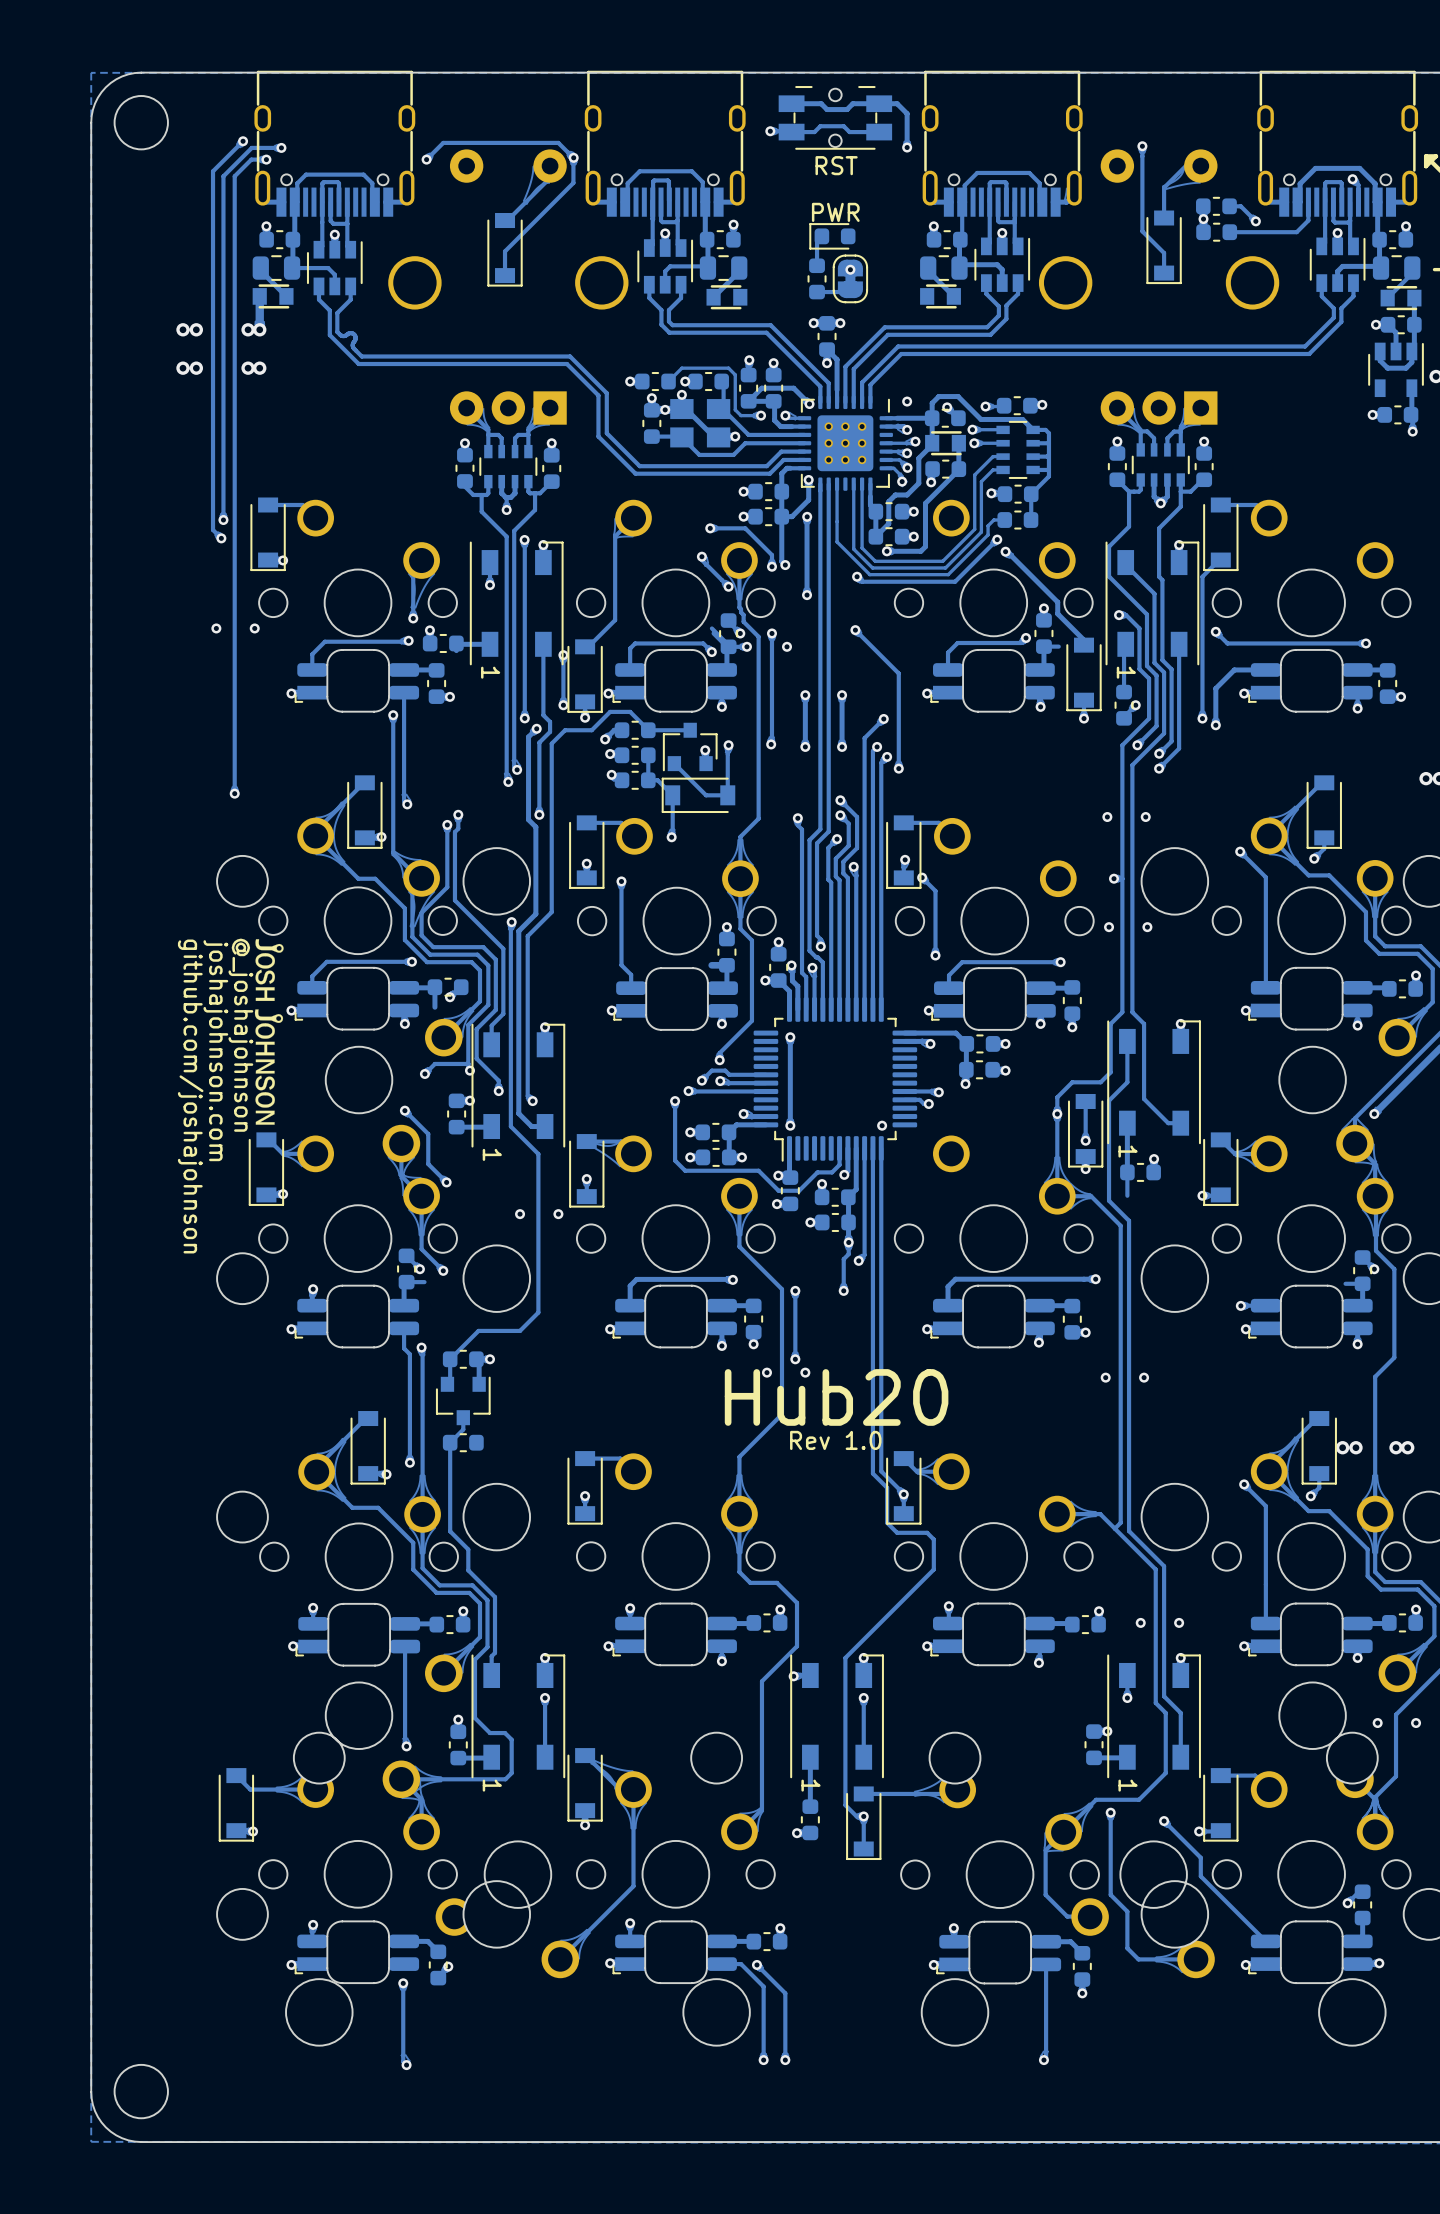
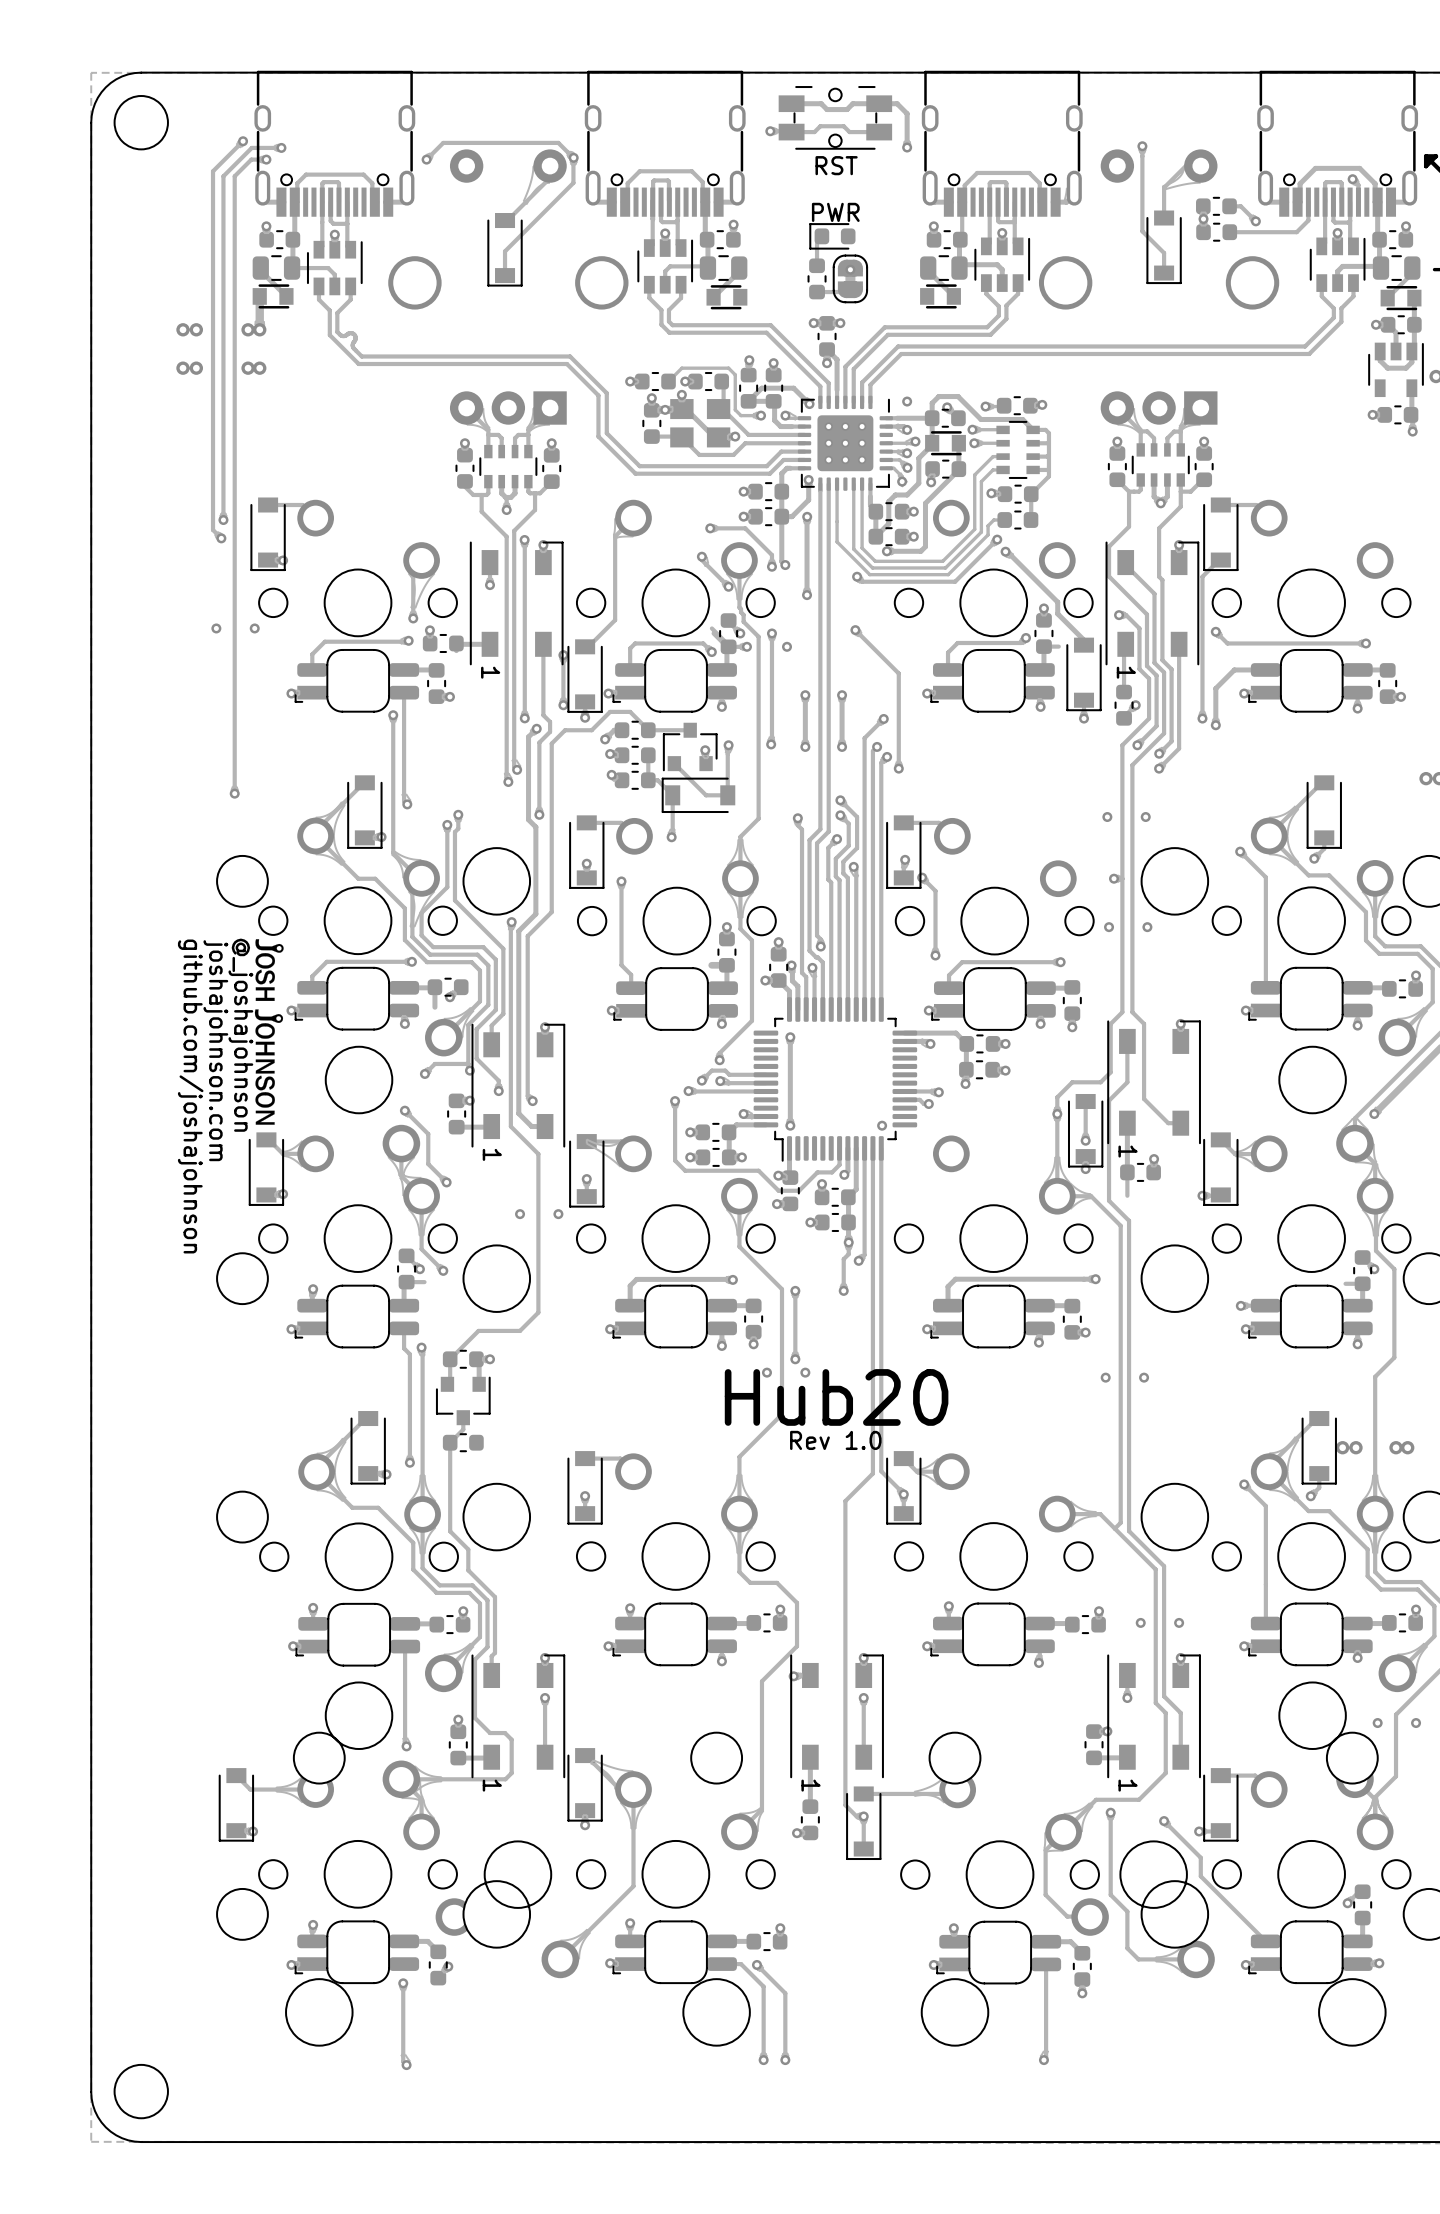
track: (872, 1473) (887, 1487) (887, 1522) (897, 1532) (927, 1532) (933, 1539) (933, 1569) (845, 1657) -> (872, 1473) (845, 1501) (845, 1657)

